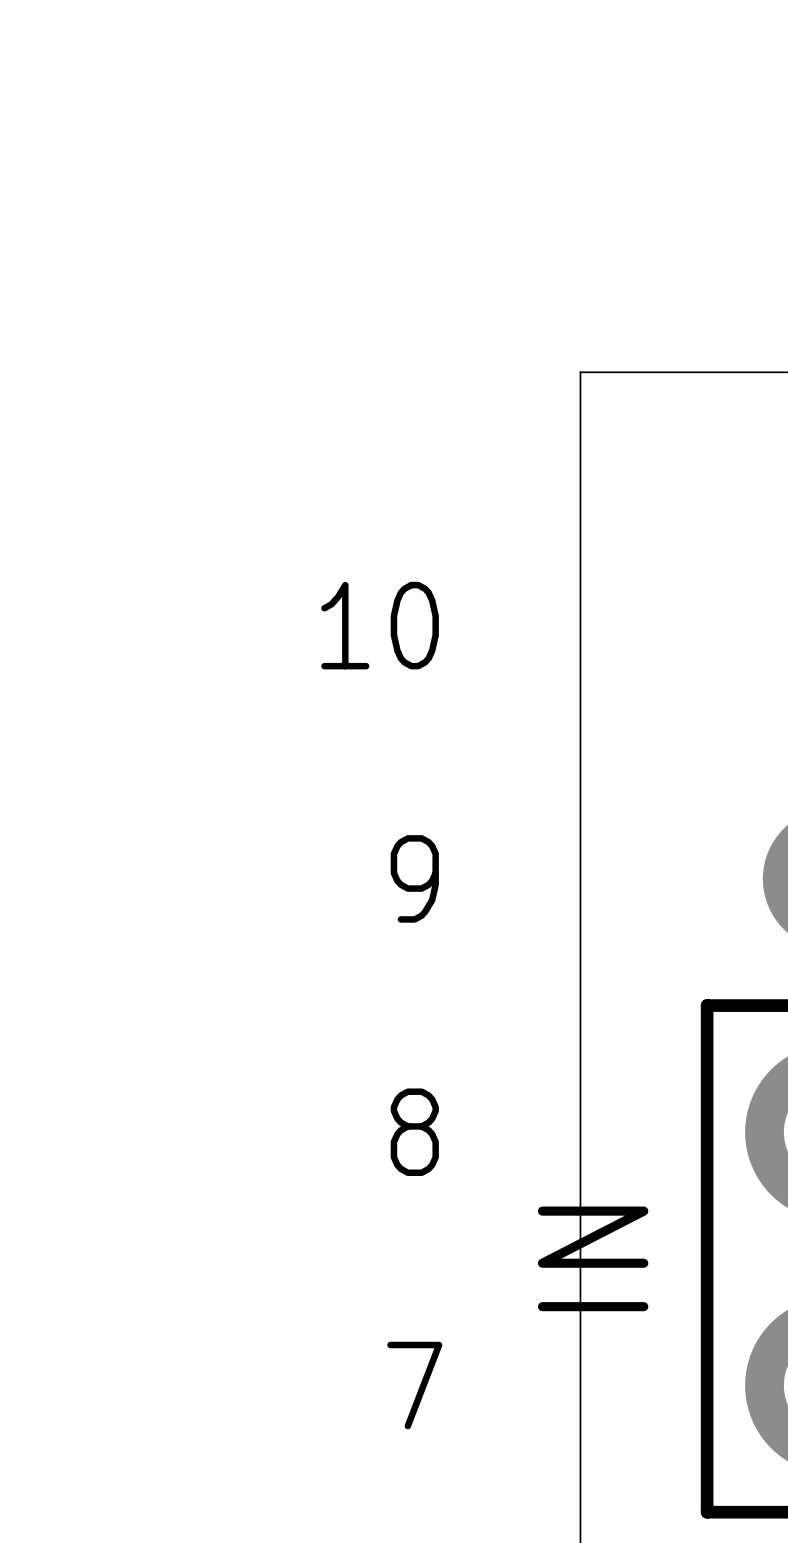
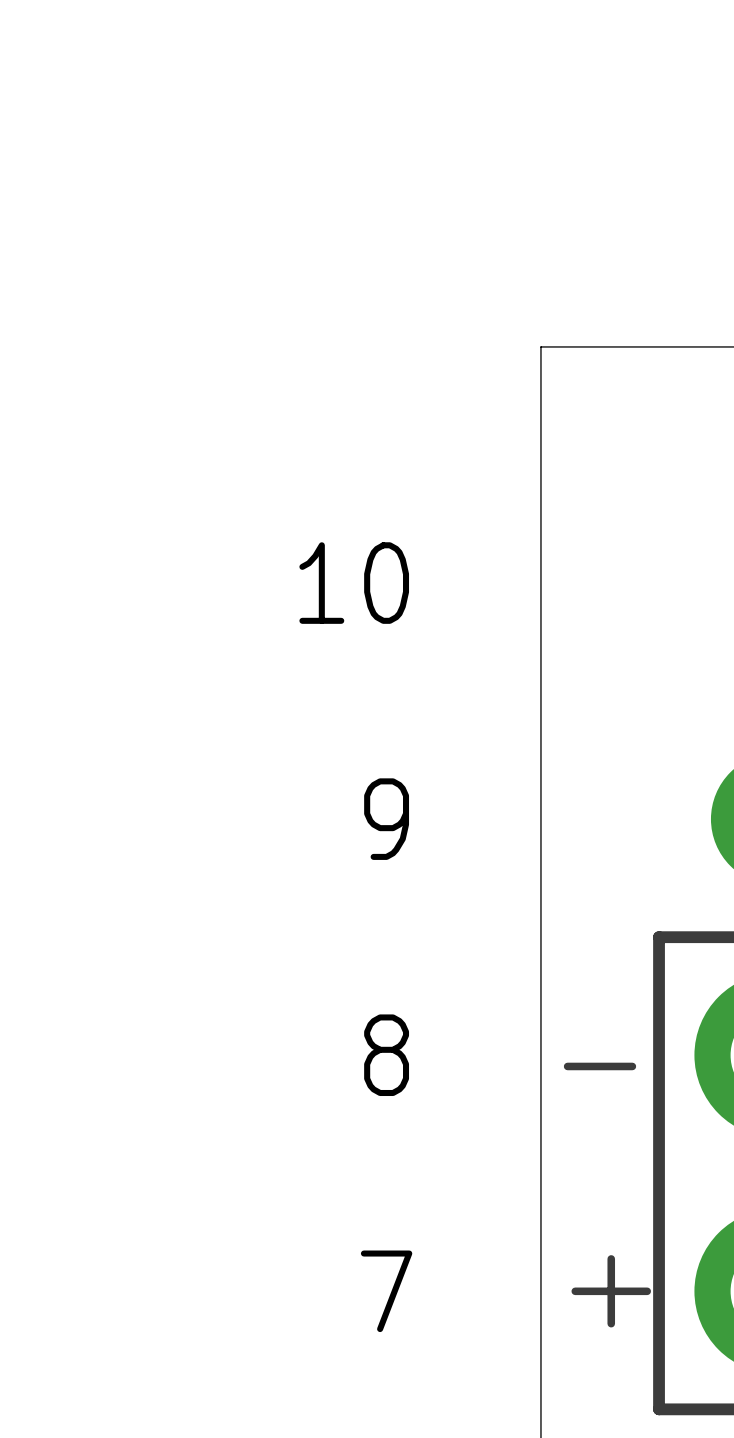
IN text: none -> - (600, 1066)
IN name: IN (593, 1258) -> none
IN text: none -> + (611, 1291)

